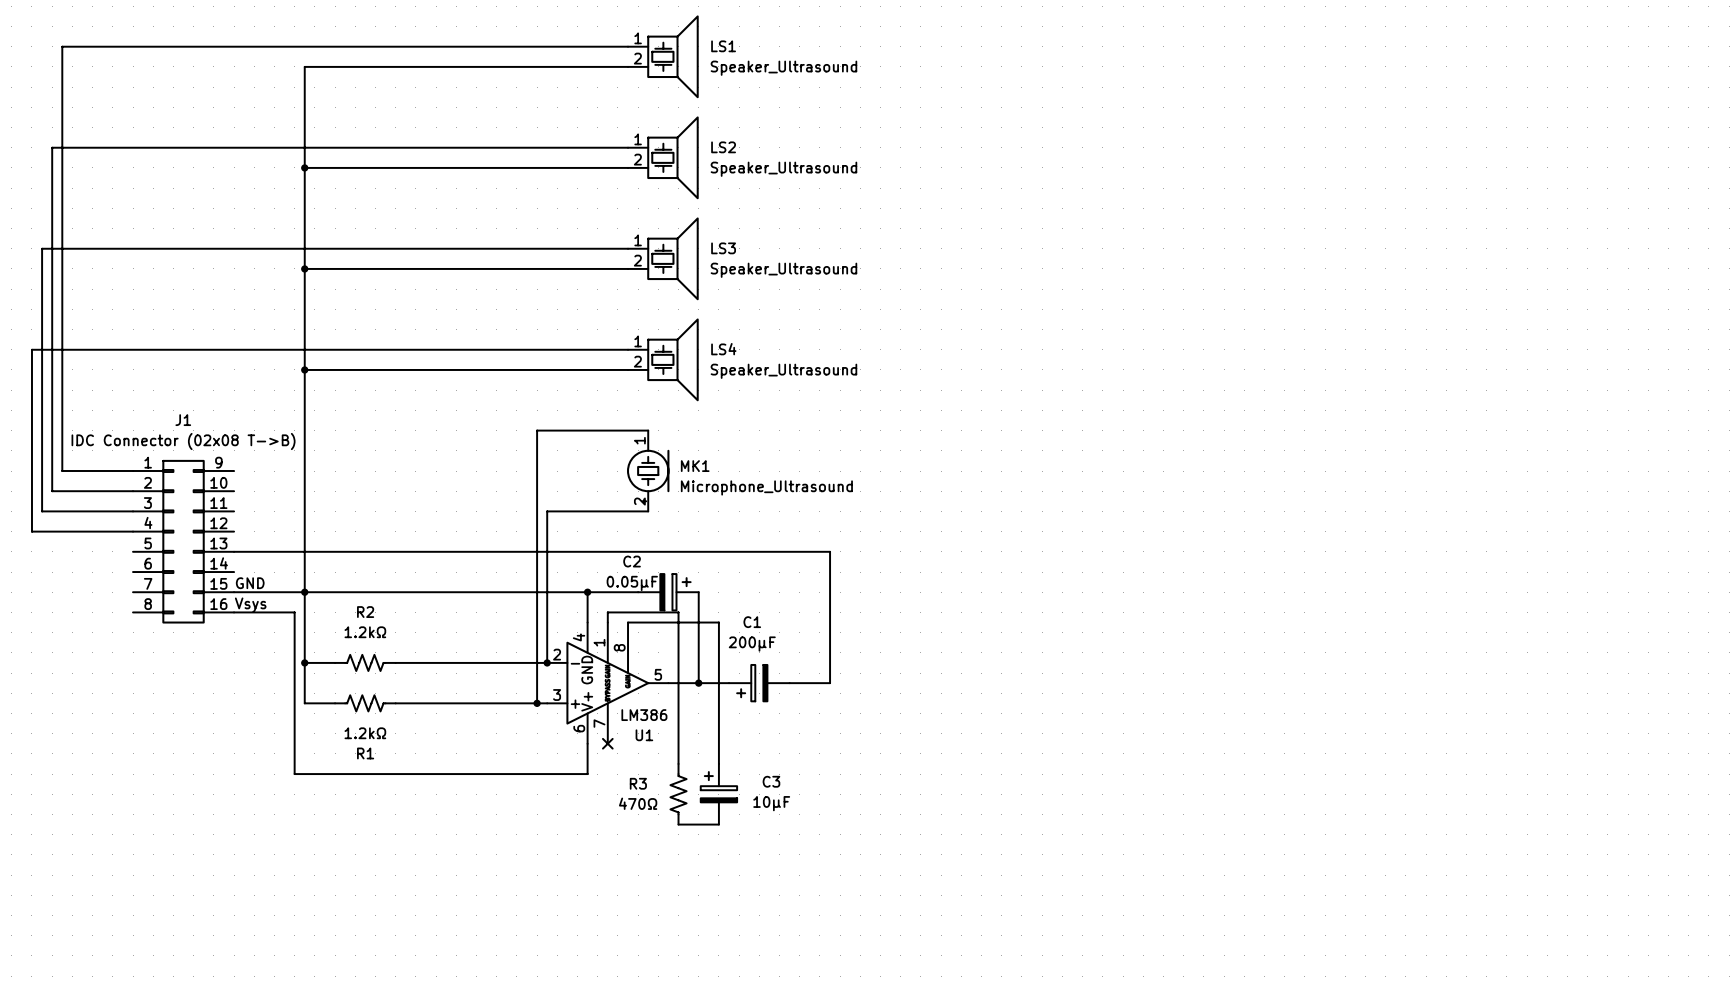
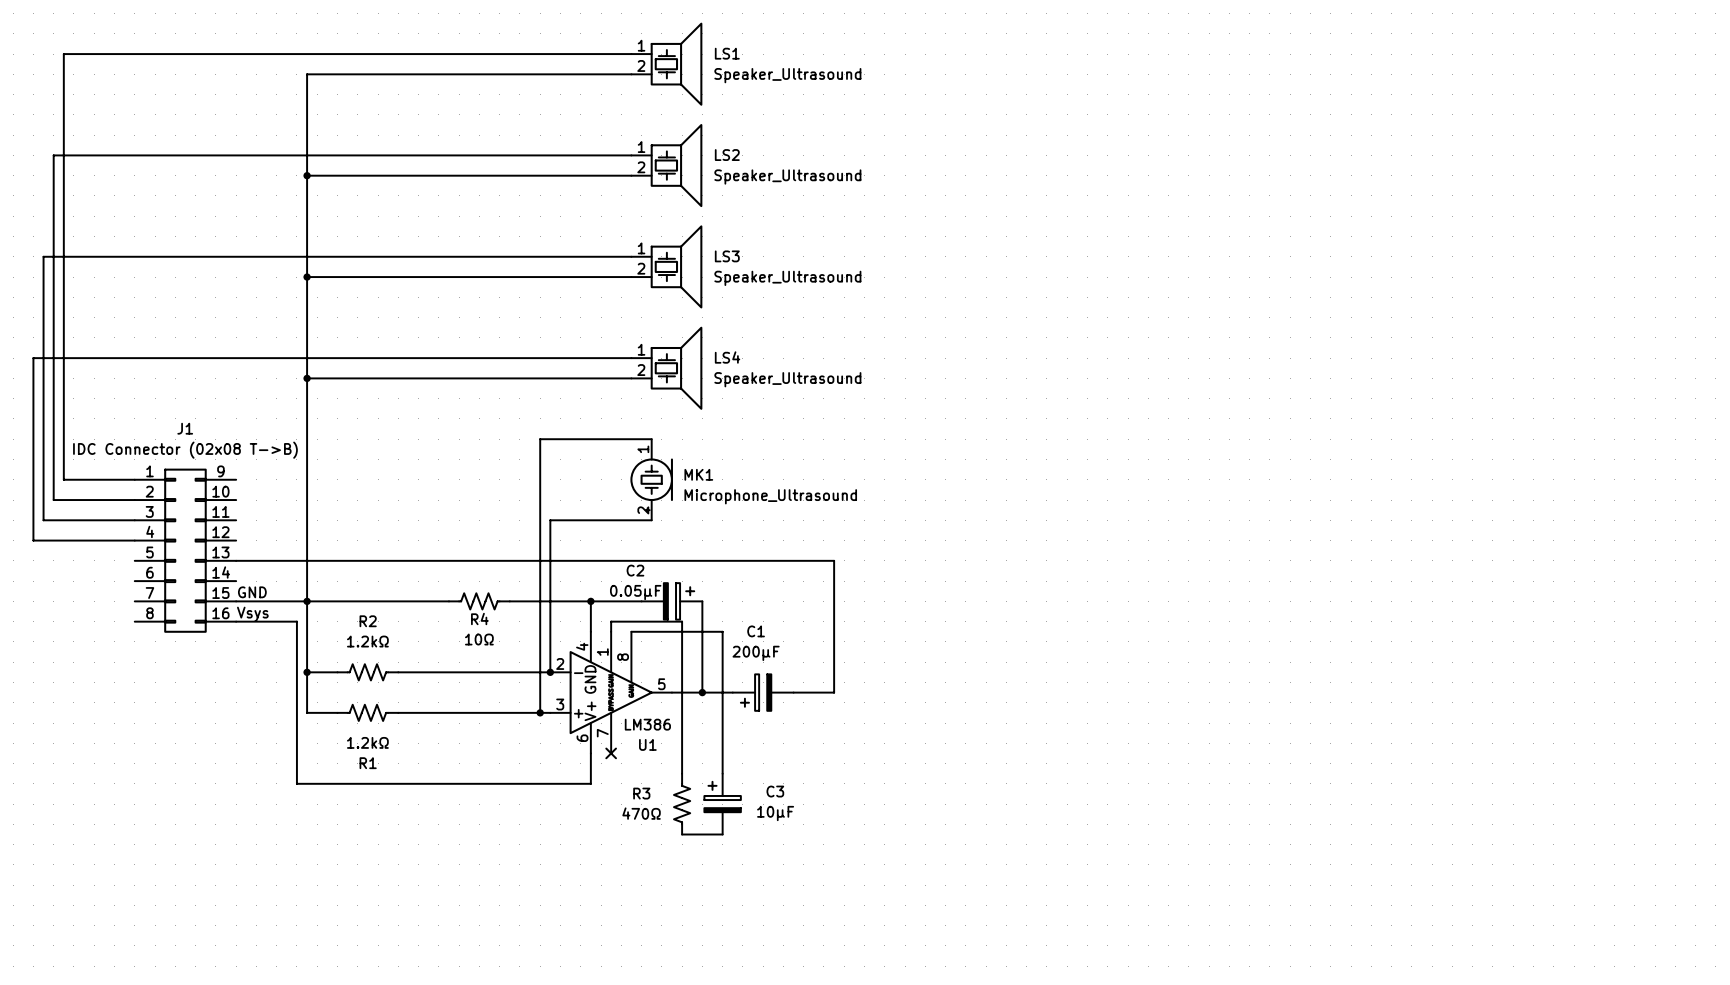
R4: none -> 10Ω (479, 601)

